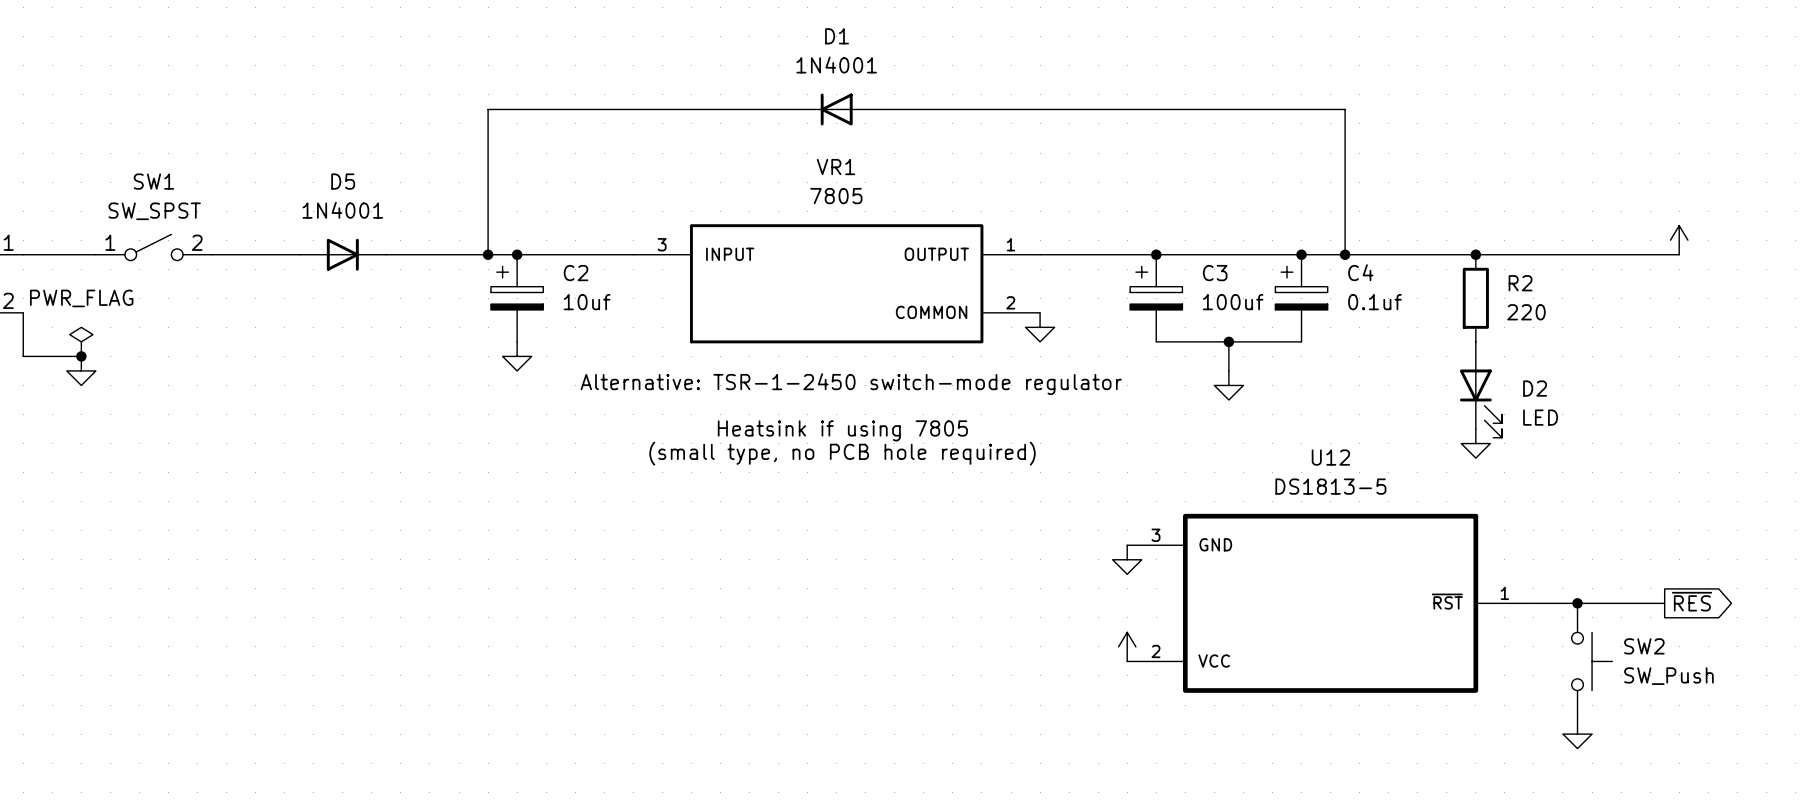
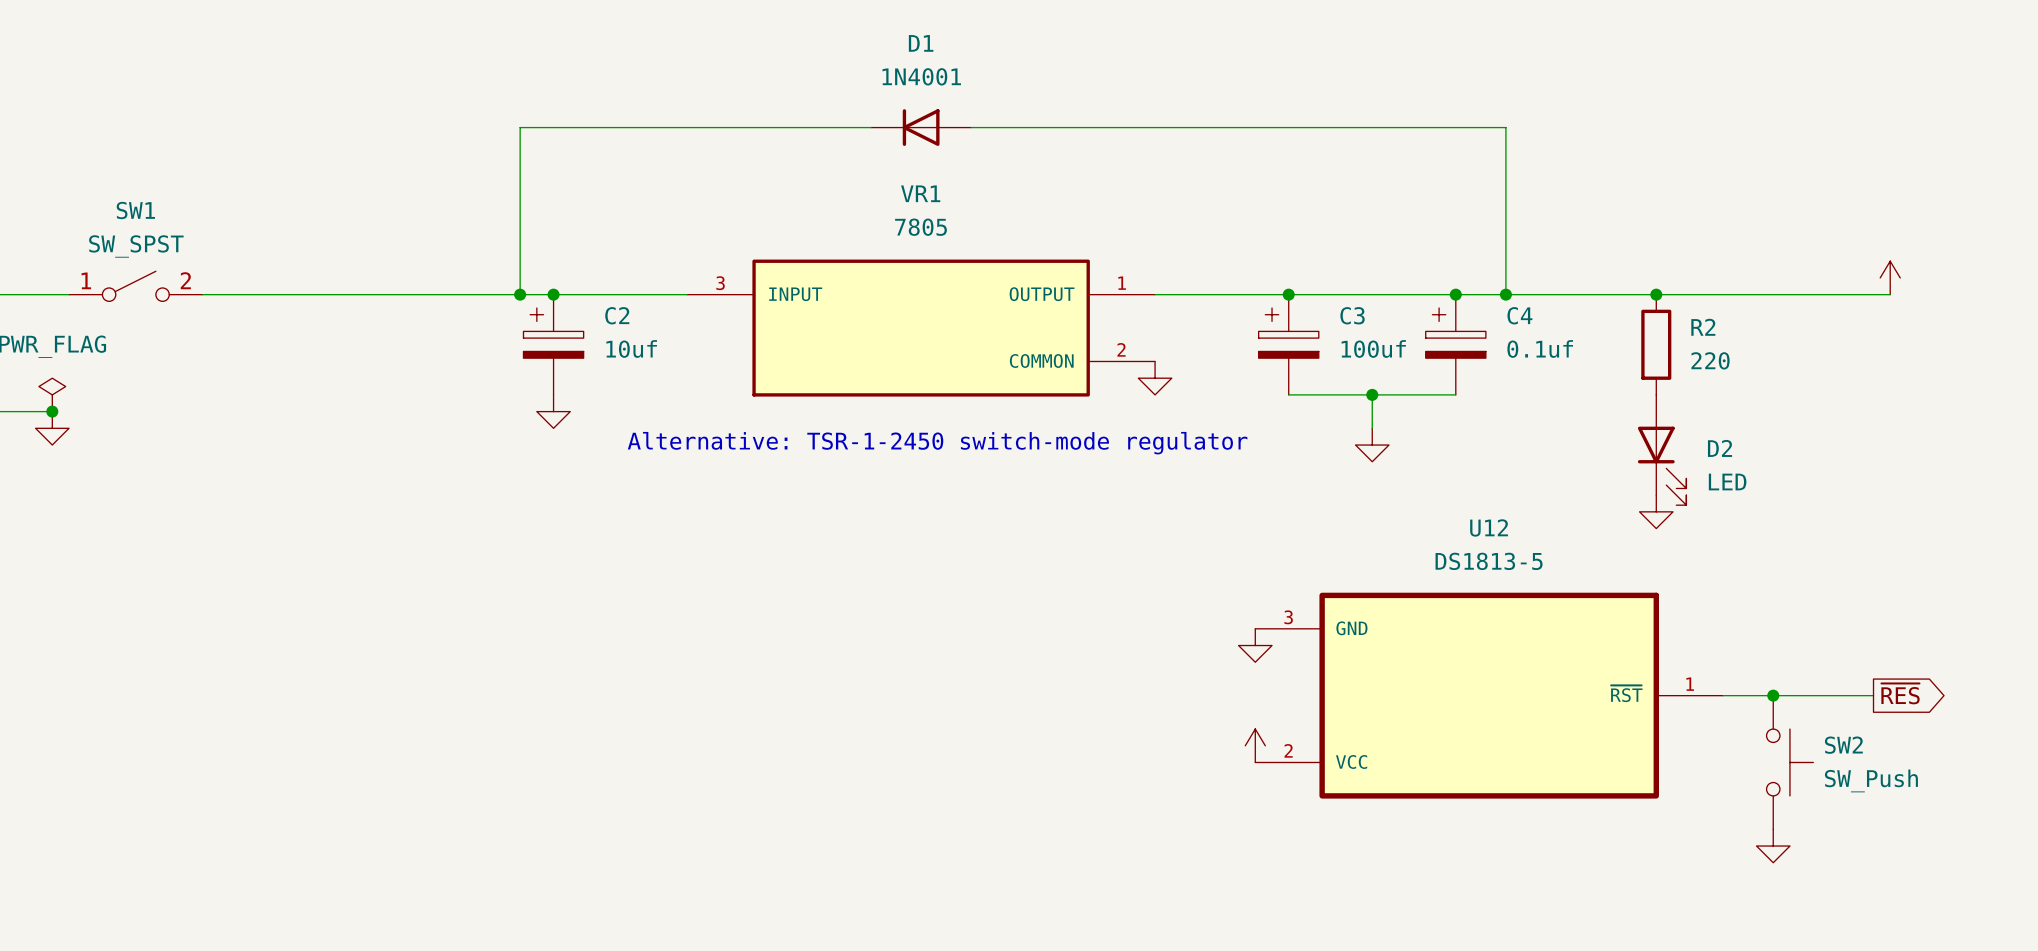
D5: 1N4001 (342, 254) -> none
text: Heatsink if using 7805 (842, 430) -> none
text: (small type, no PCB hole required) (842, 453) -> none

